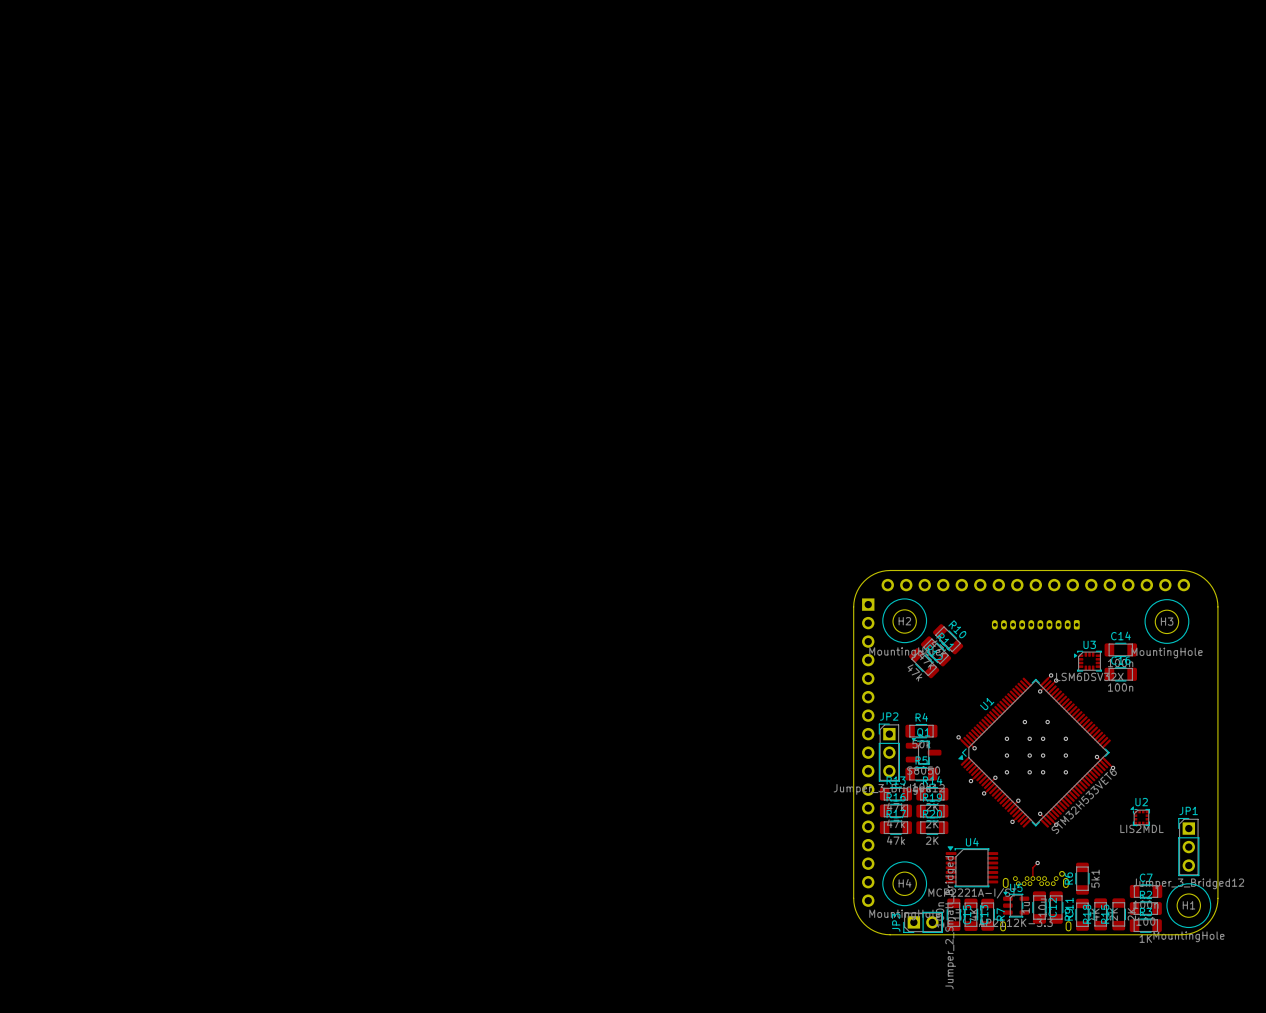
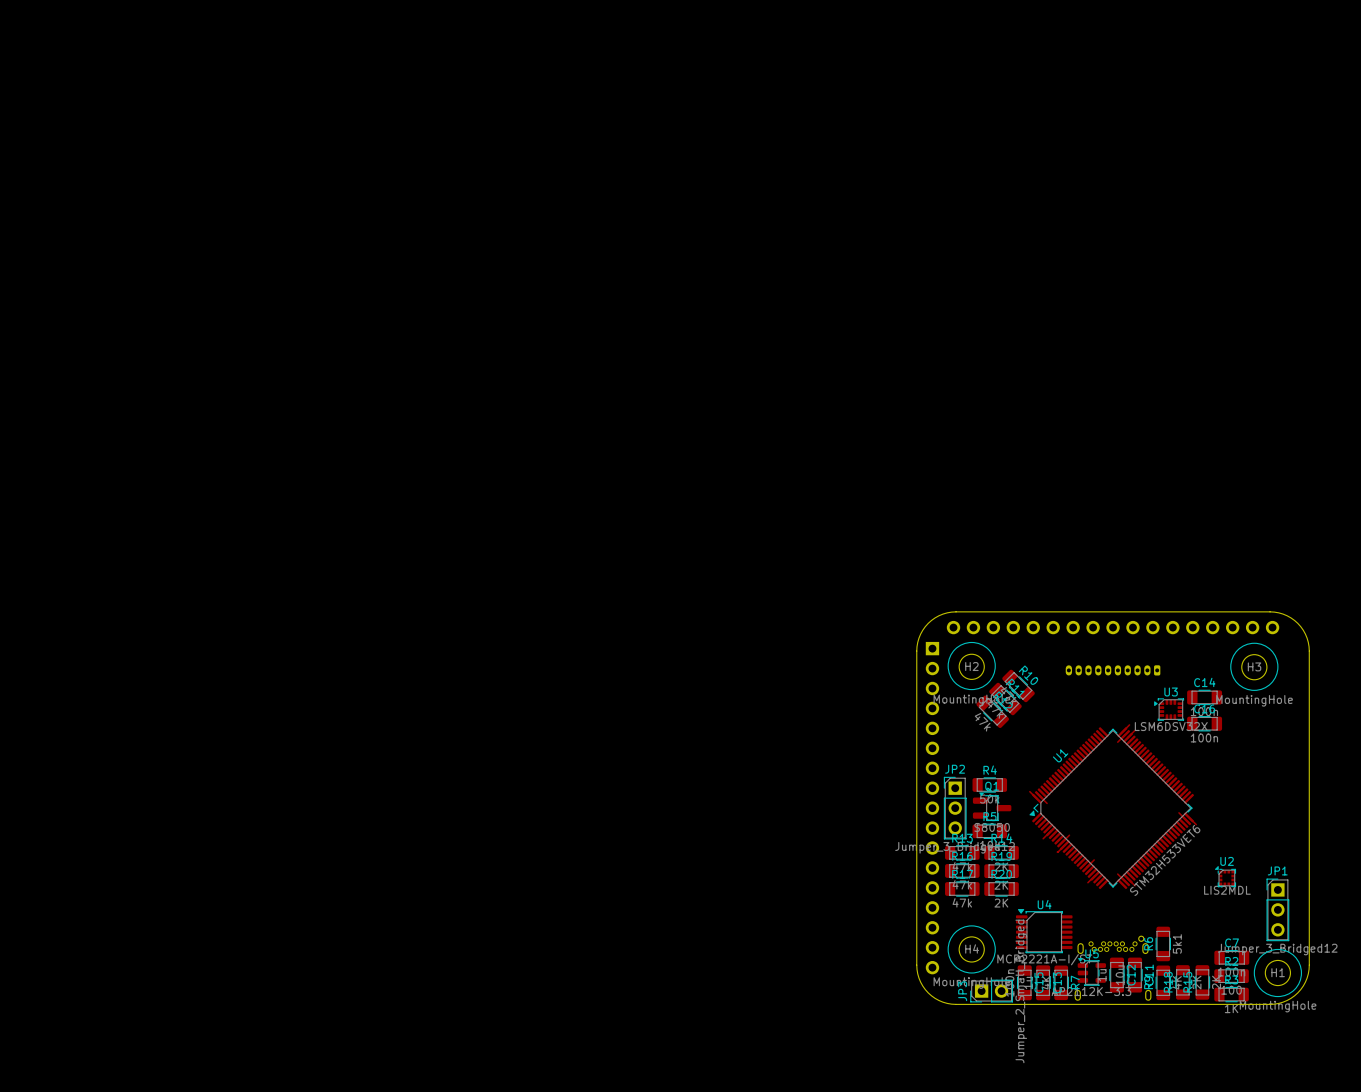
via: (1051, 675) -> none
via: (1056, 680) -> none
via: (1040, 691) -> none
via: (1024, 722) -> none
via: (1047, 722) -> none
via: (958, 737) -> none
via: (1006, 738) -> none
via: (1029, 738) -> none
via: (1043, 738) -> none
via: (1065, 738) -> none
via: (974, 748) -> none
via: (1006, 755) -> none
via: (1029, 755) -> none
via: (1043, 755) -> none
via: (1065, 755) -> none
via: (1097, 757) -> none
via: (1113, 767) -> none
via: (1006, 772) -> none
via: (1029, 772) -> none
via: (1043, 772) -> none
via: (1065, 772) -> none
via: (995, 777) -> none
via: (970, 781) -> none
via: (984, 793) -> none
via: (1018, 800) -> none
via: (1040, 813) -> none
via: (1012, 821) -> none
via: (1056, 824) -> none
track: (1037, 863) (1032, 867) (1032, 878) -> none
via: (1037, 863) -> none

